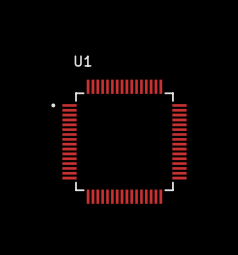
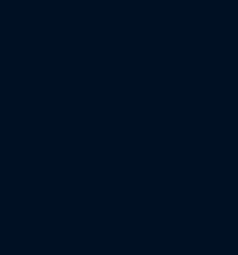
U1: (118, 141) -> none

